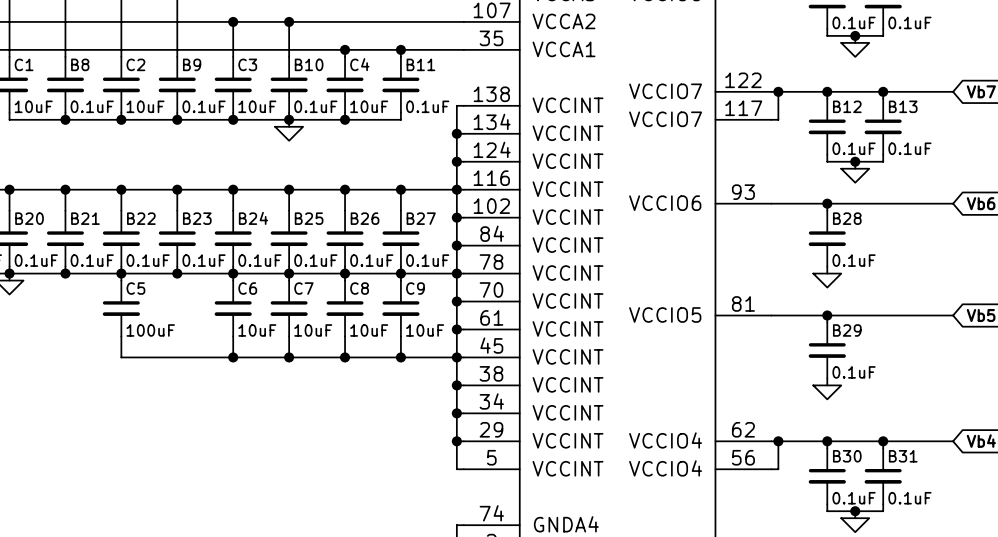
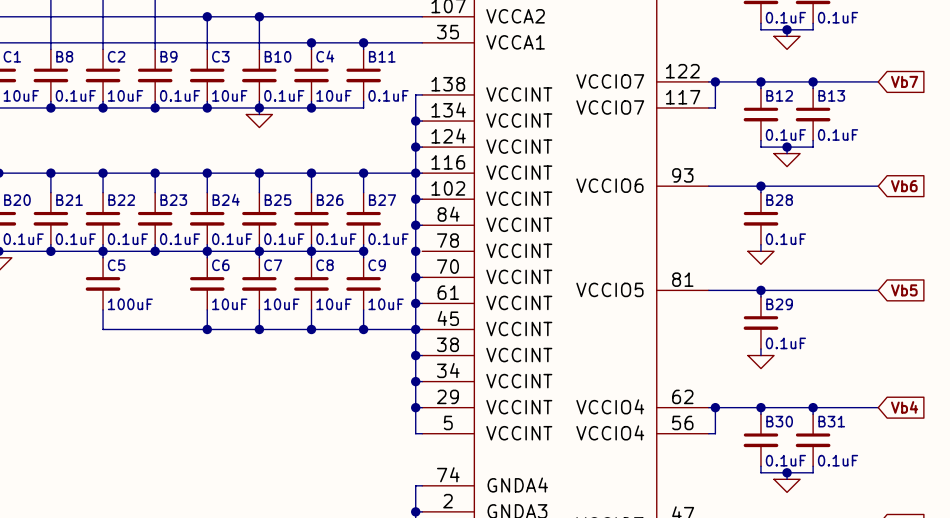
wire: (400, 273) (463, 273) -> none

